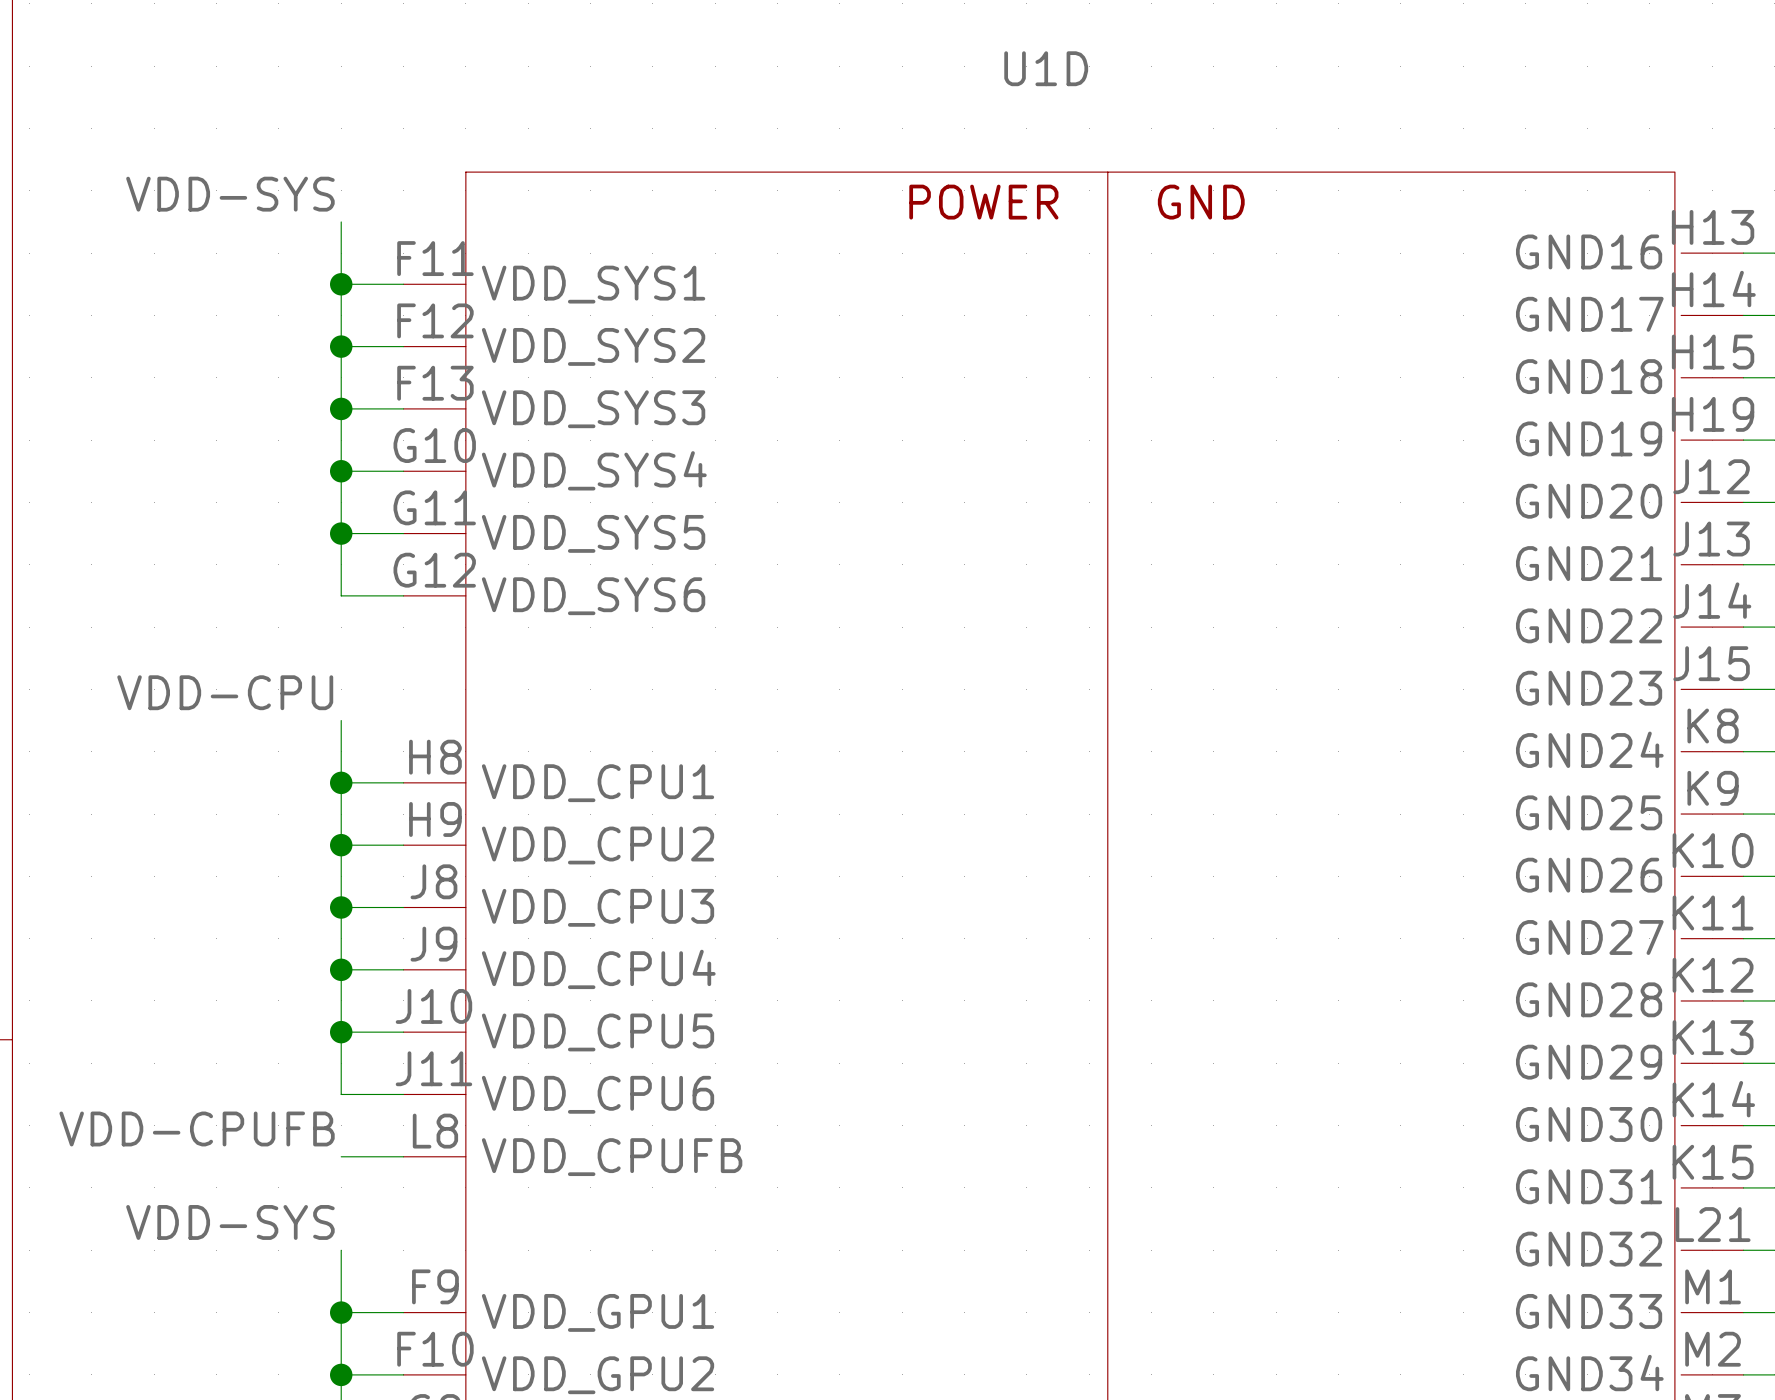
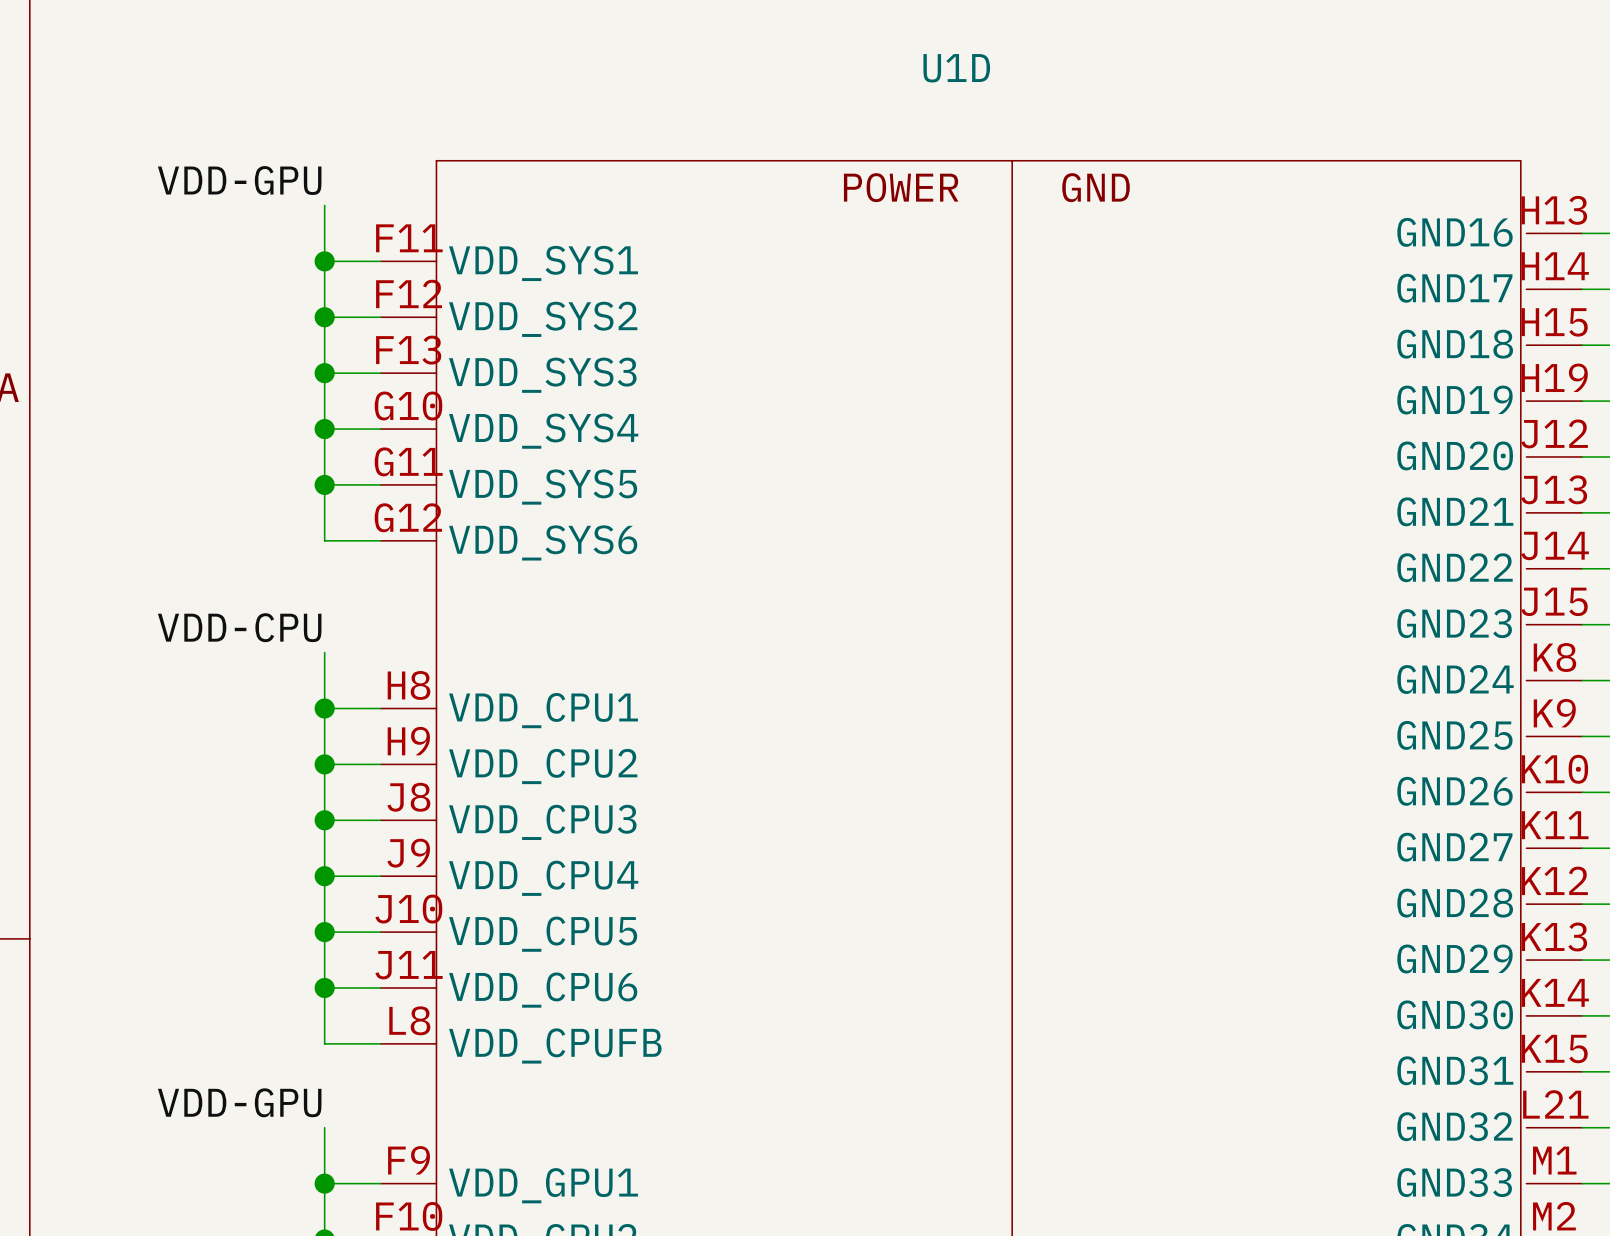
label: VDD-SYS (230, 194) -> VDD-GPU (239, 180)
wire: none -> (324, 987) (324, 1043)
junction: none -> (324, 987)
label: VDD-CPUFB (197, 1128) -> none
label: VDD-SYS (230, 1222) -> VDD-GPU (239, 1102)

